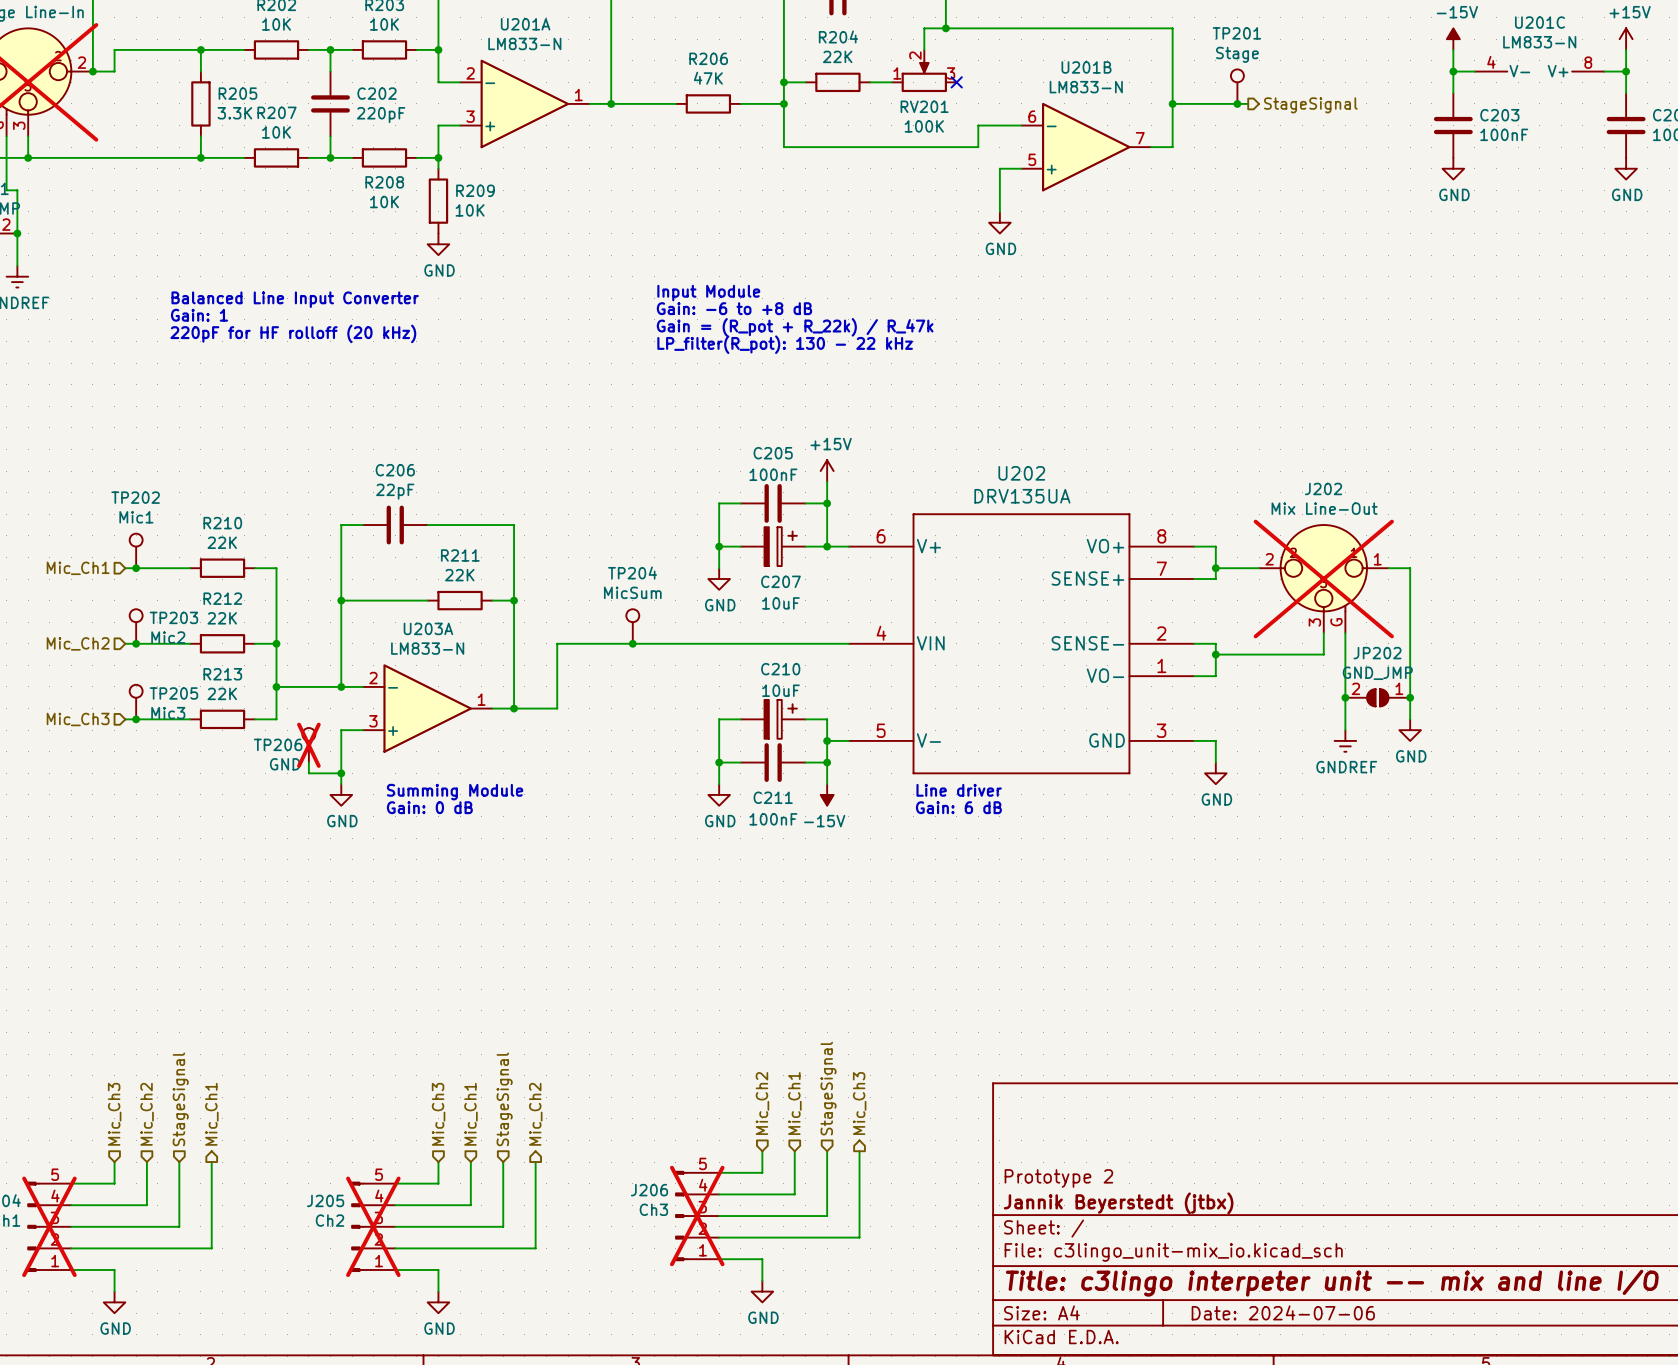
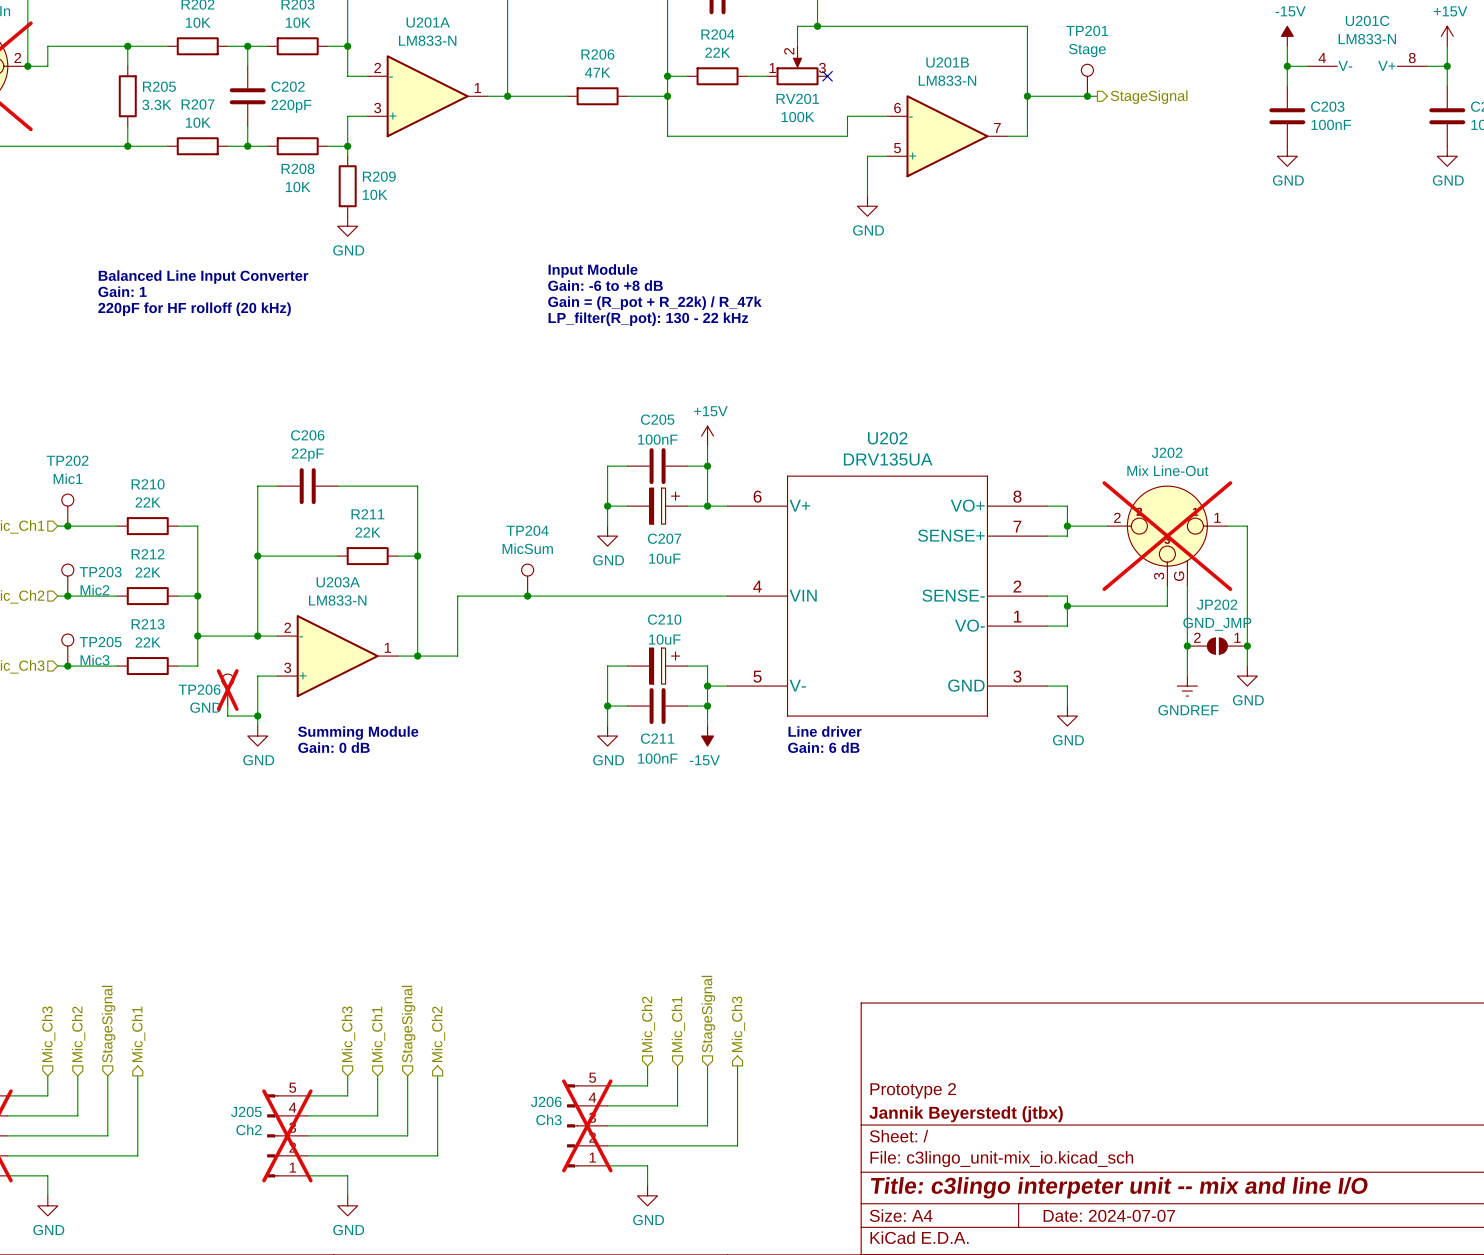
title block: Date: 2024-07-06 (1283, 1312) -> Date: 2024-07-07 (1109, 1215)

